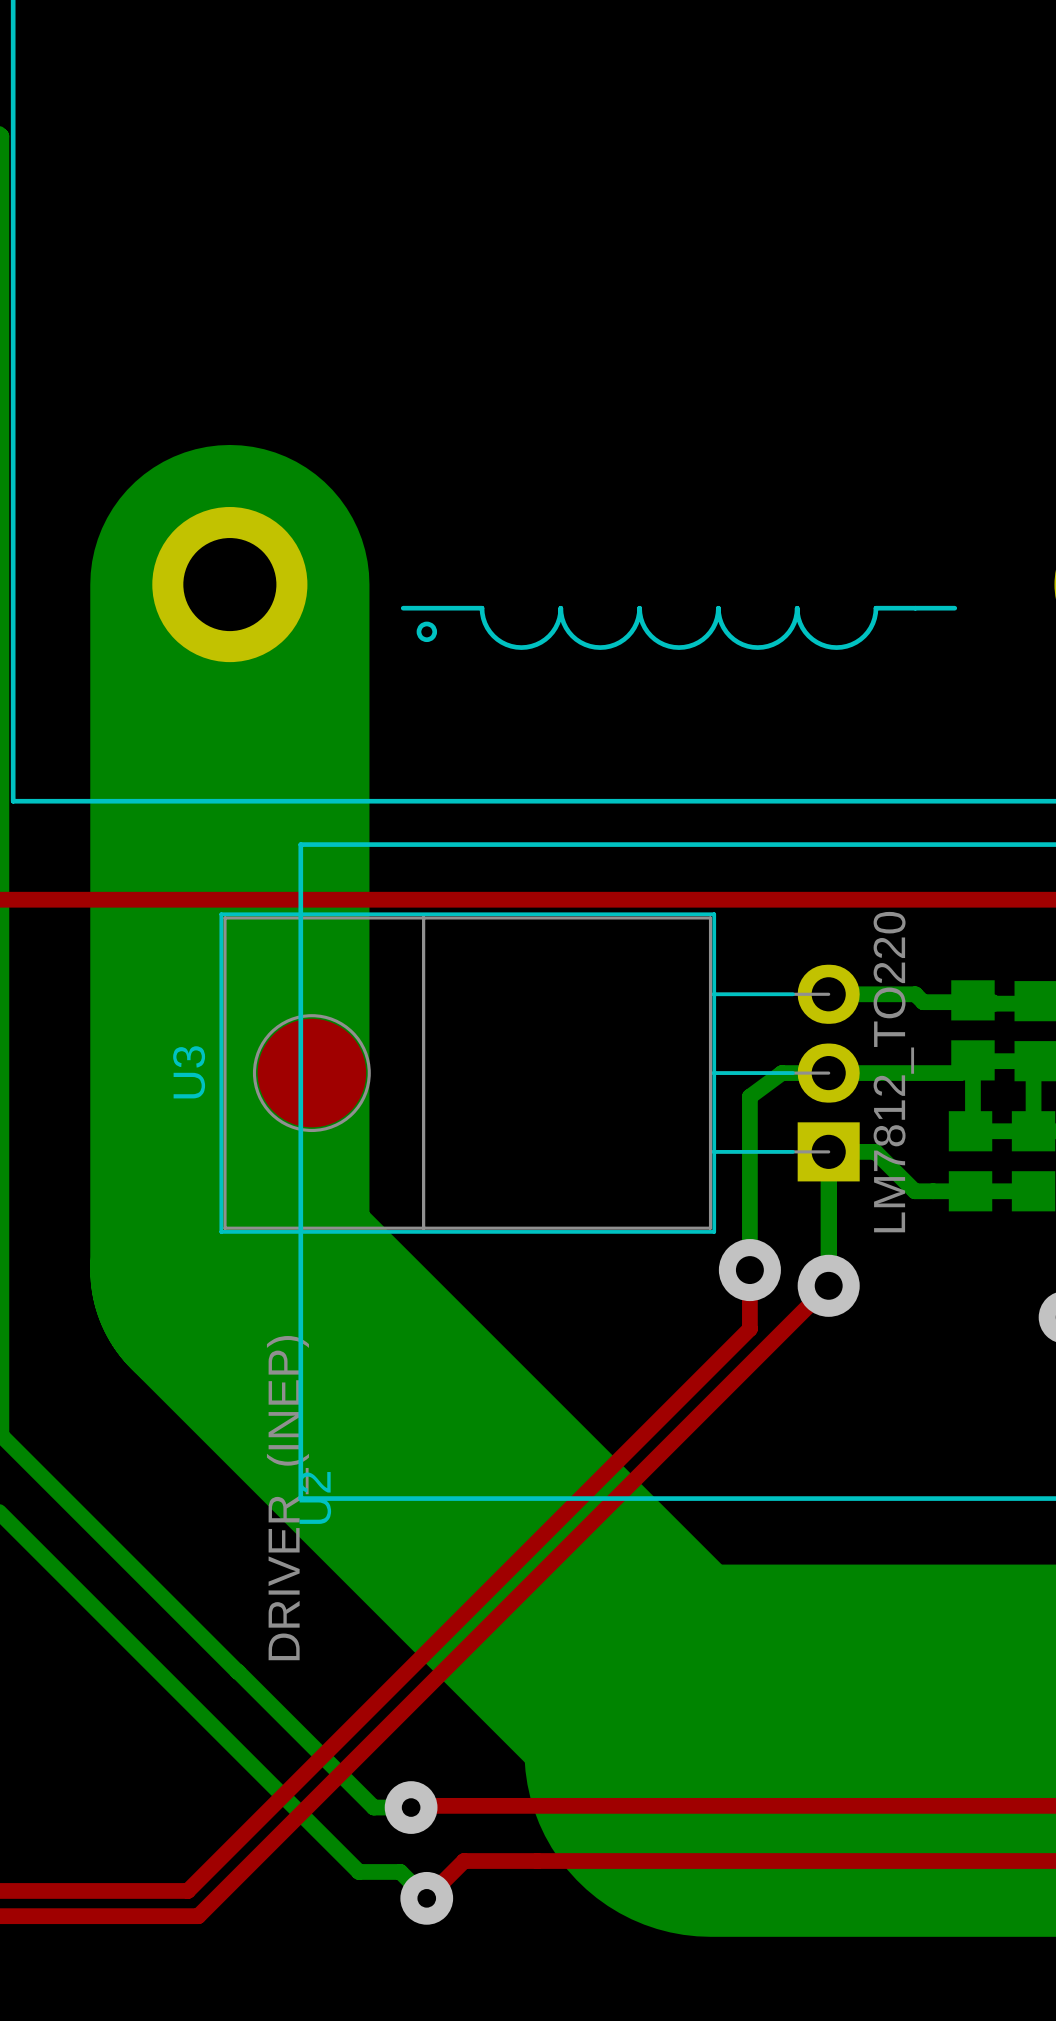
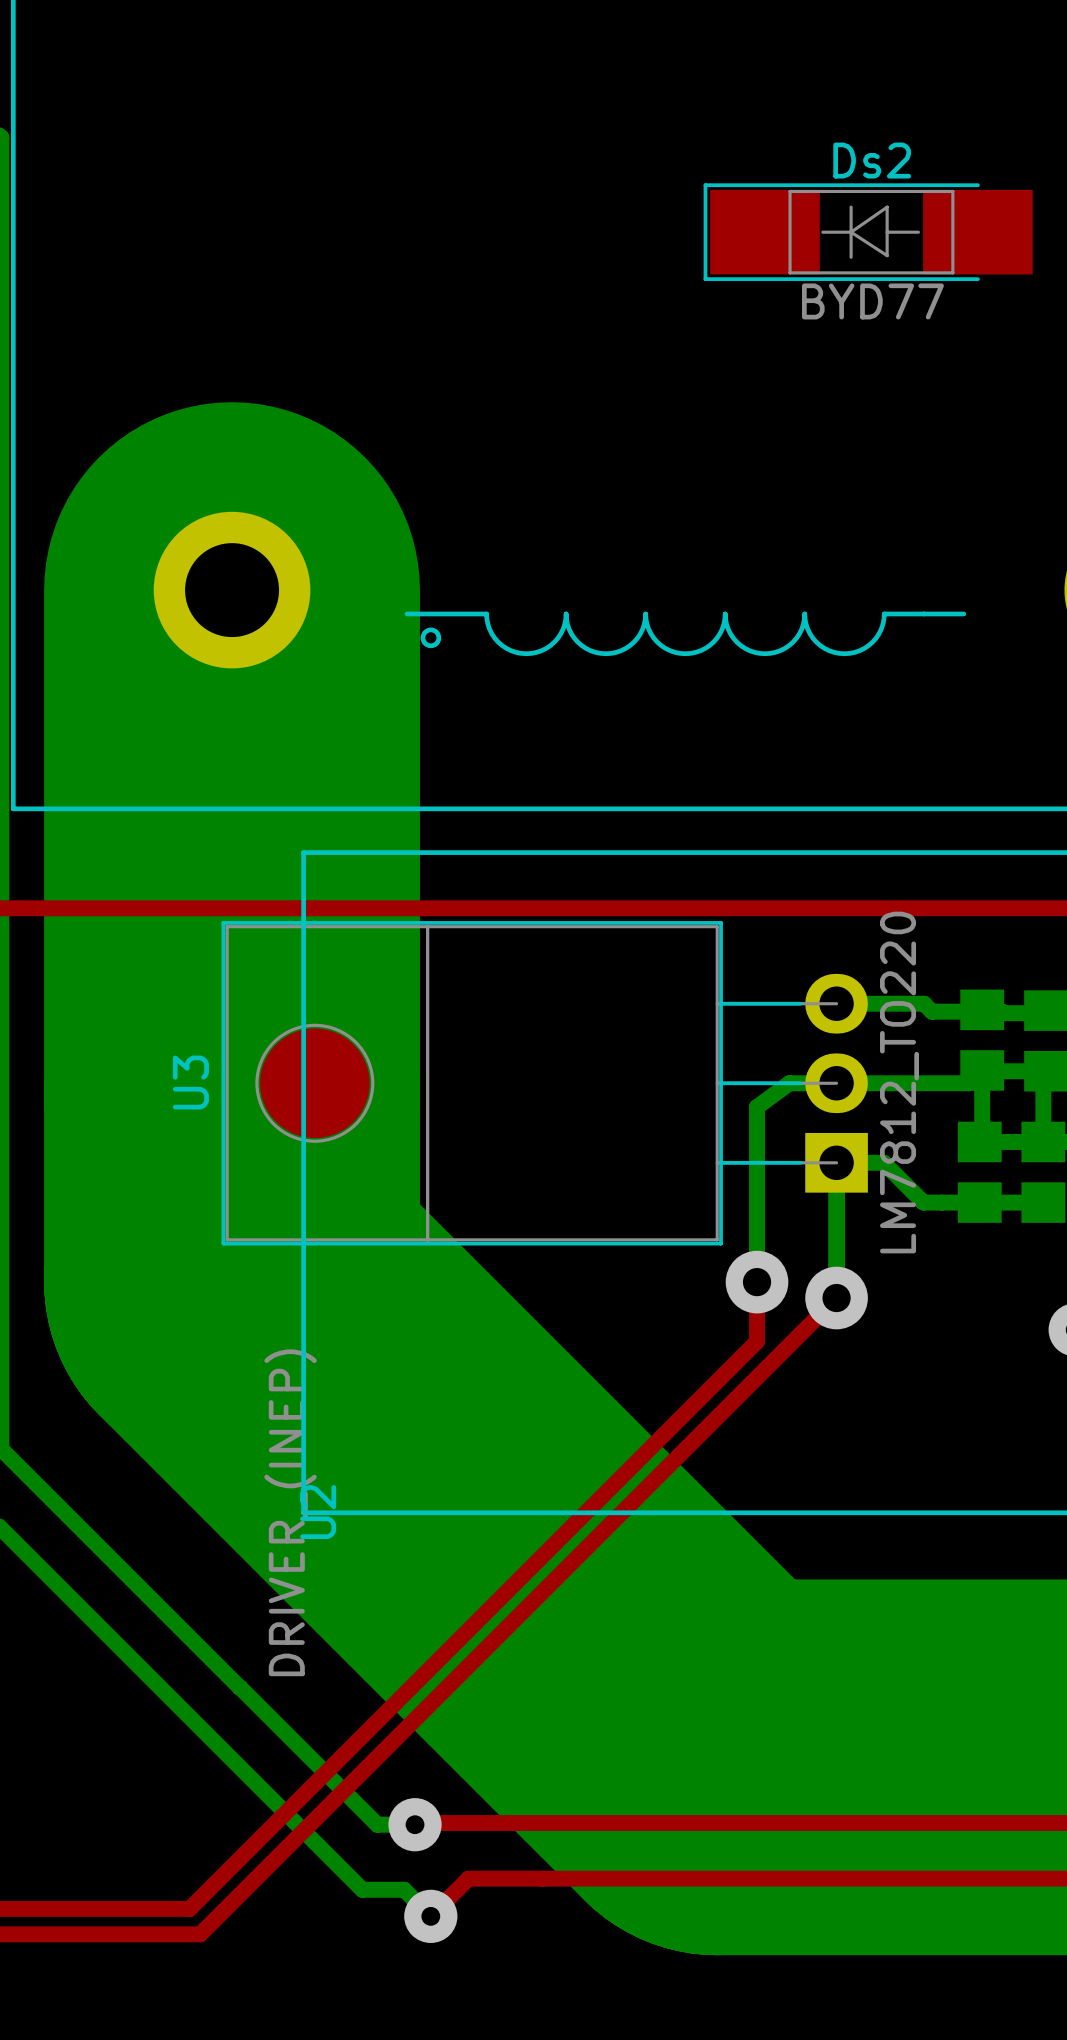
Ds2: none -> BYD77 (868, 232)
bottom track width: thin (229, 584) (229, 1270) (710, 1750) -> thick (232, 590) (232, 1282) (717, 1767)

